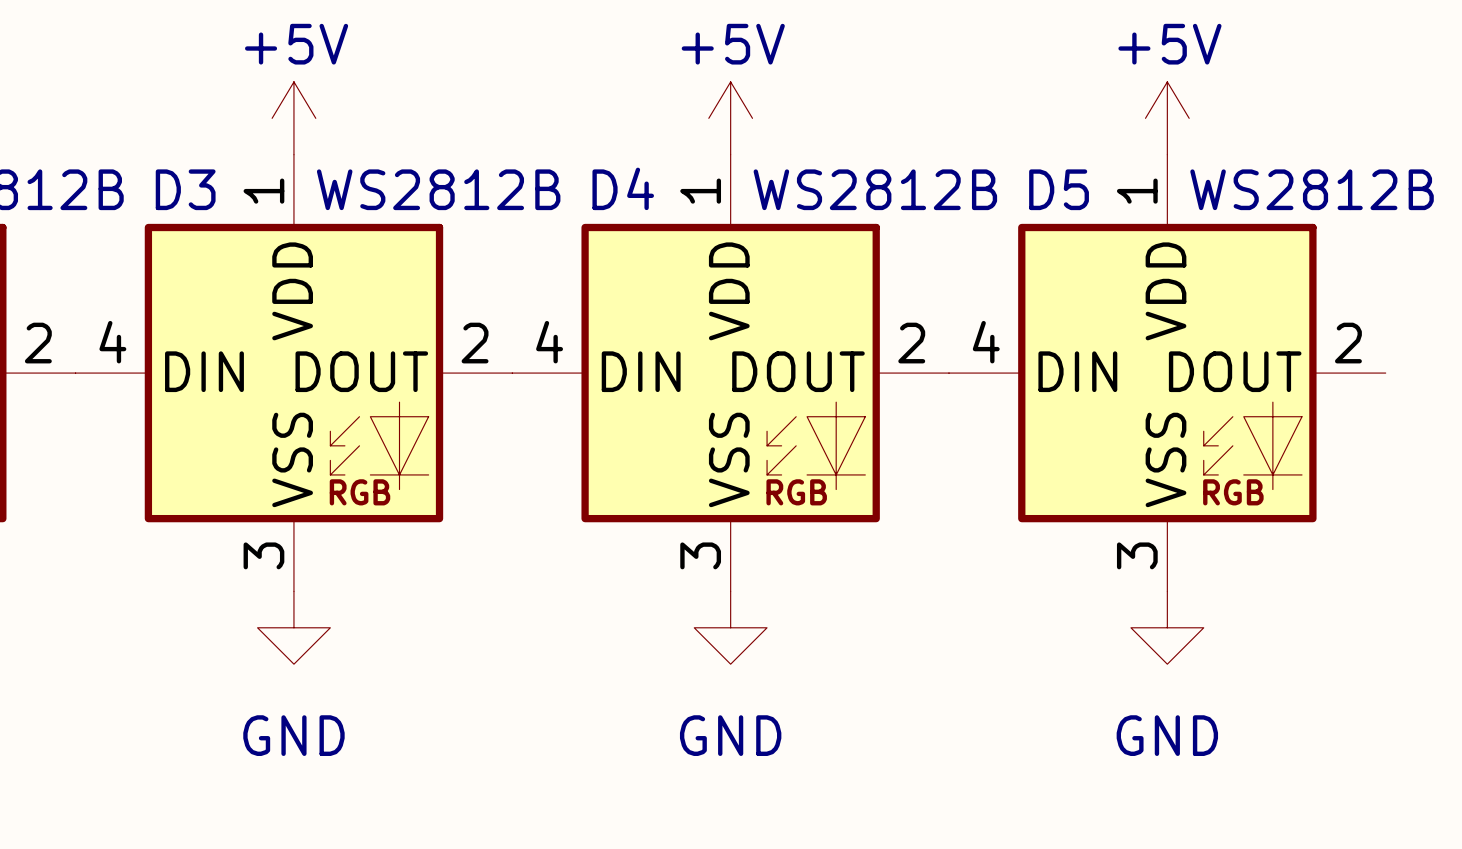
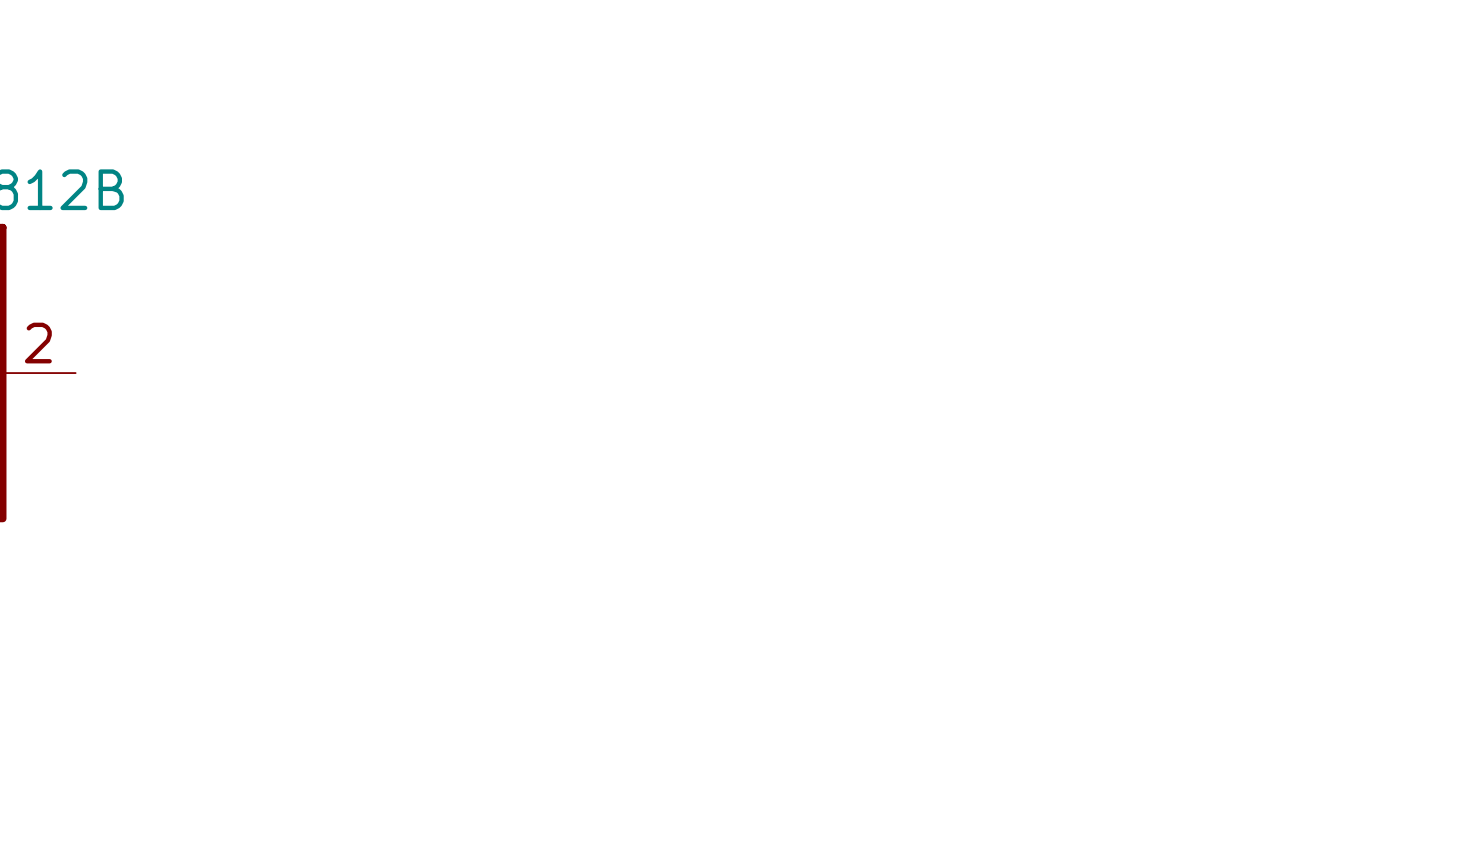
power symbol: +5V (293, 118) -> none
power symbol: +5V (730, 118) -> none
power symbol: +5V (1167, 118) -> none
D3: WS2812B (293, 373) -> none
D4: WS2812B (730, 373) -> none
D5: WS2812B (1167, 373) -> none
power symbol: GND (293, 627) -> none
power symbol: GND (730, 627) -> none
power symbol: GND (1167, 627) -> none

